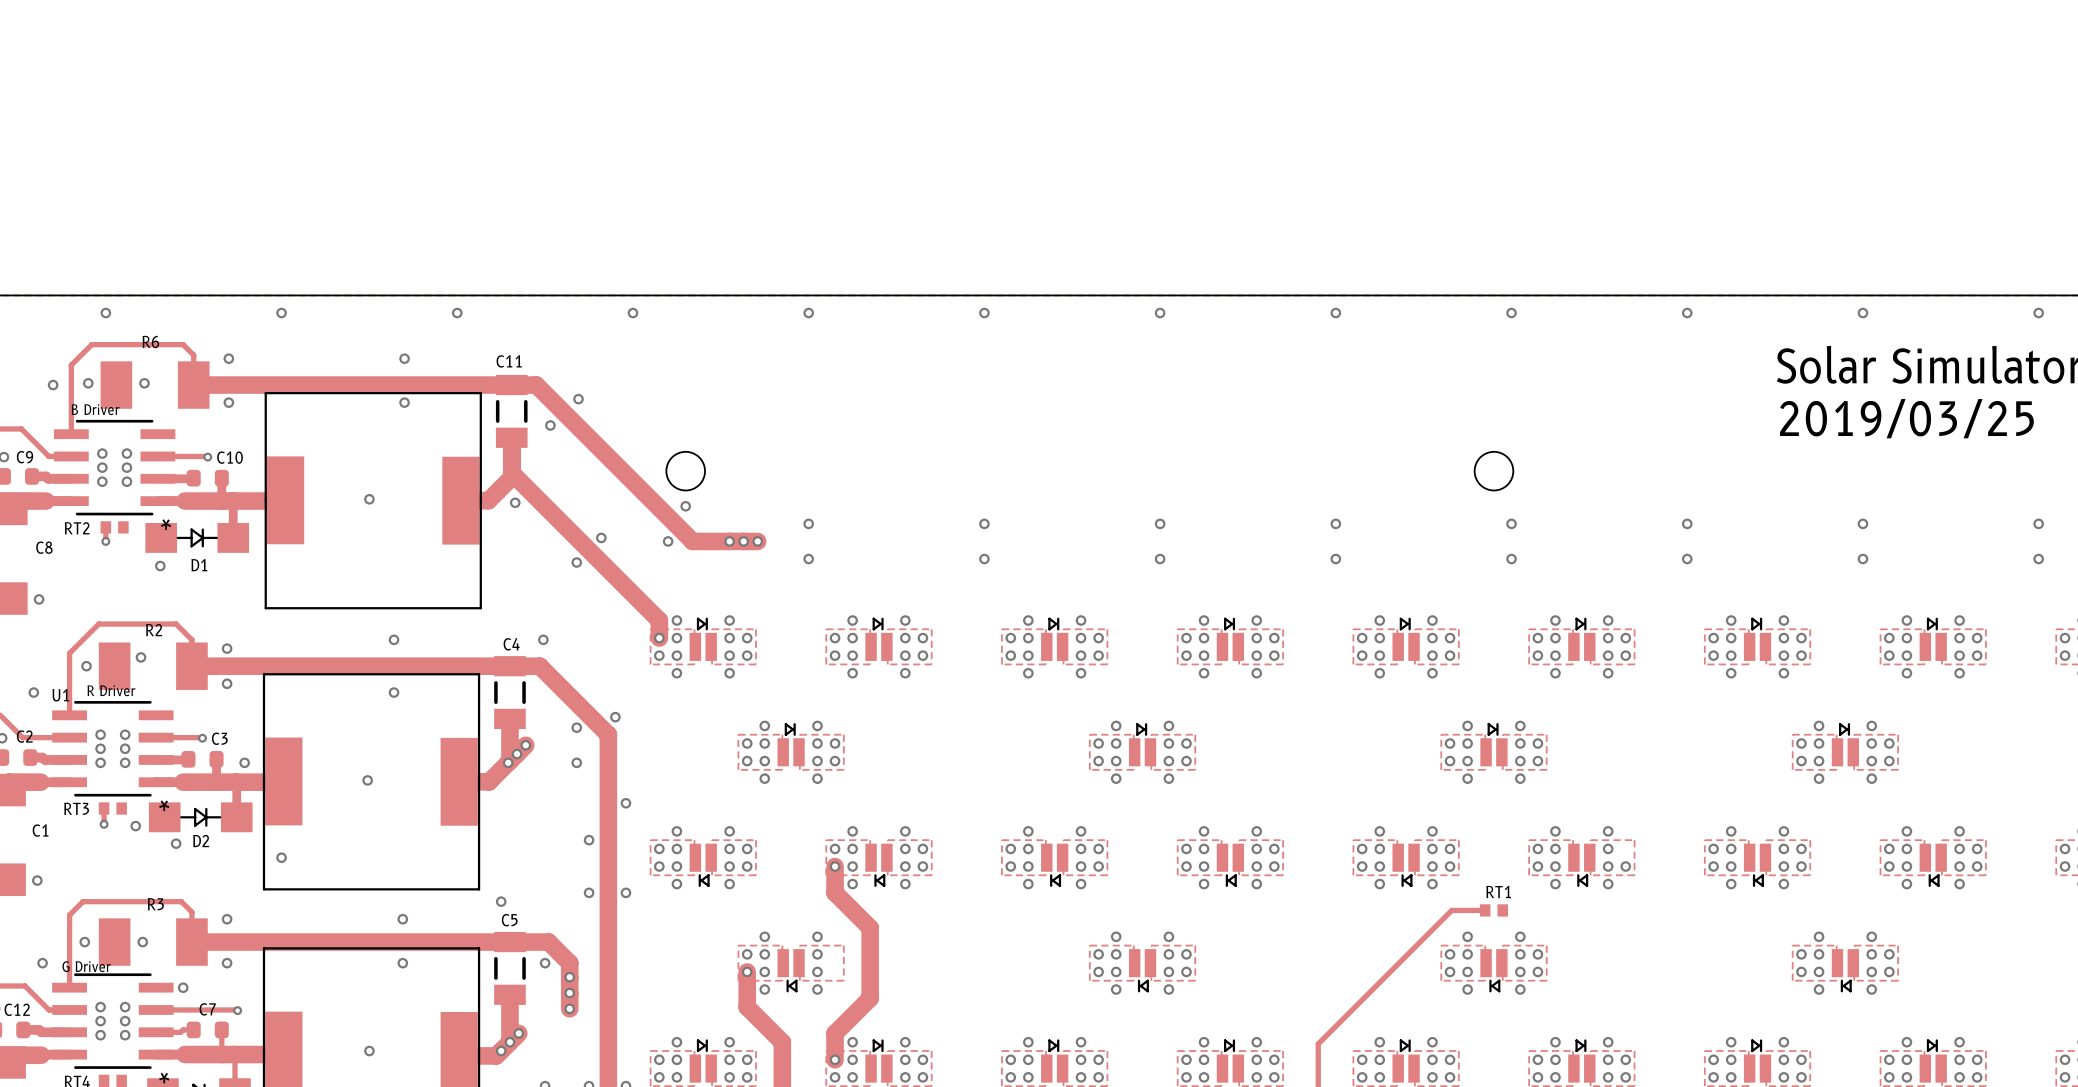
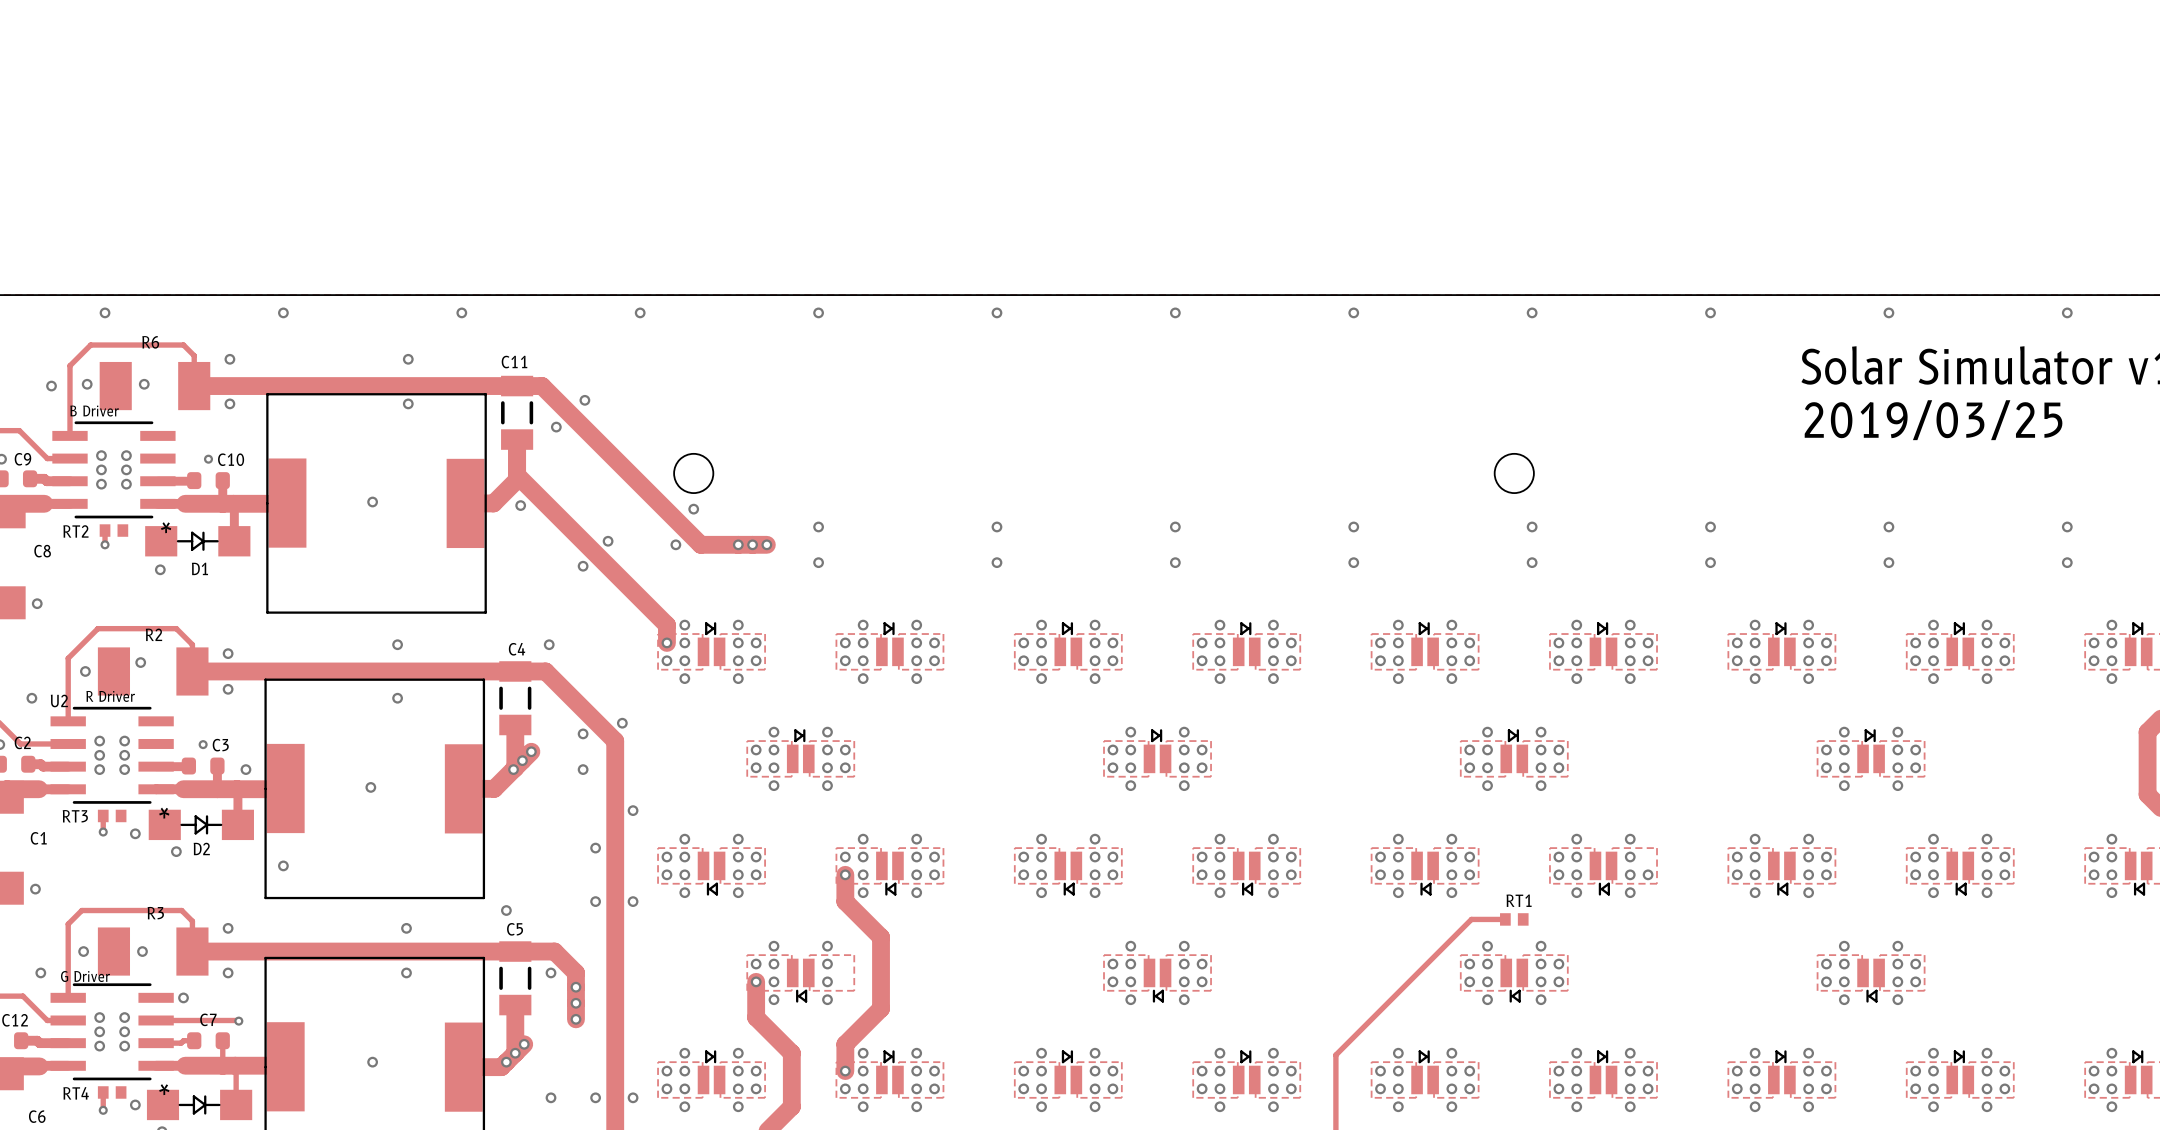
track: (157, 456) (207, 456) -> none
U1 name: U1 (60, 695) -> U2 (59, 700)
track: (156, 737) (201, 737) -> none

